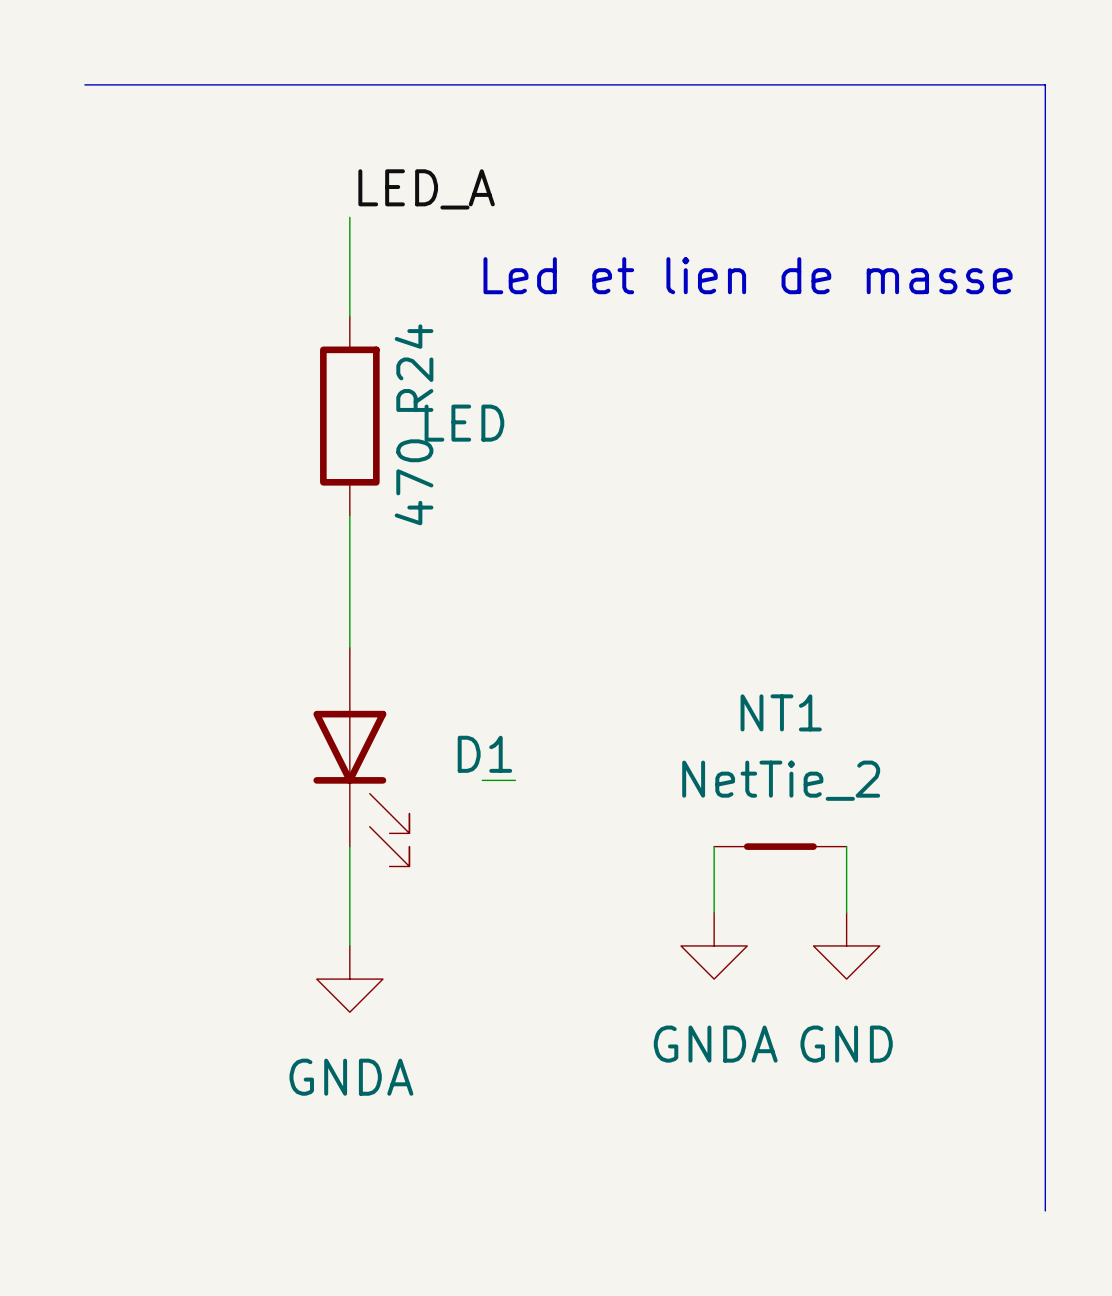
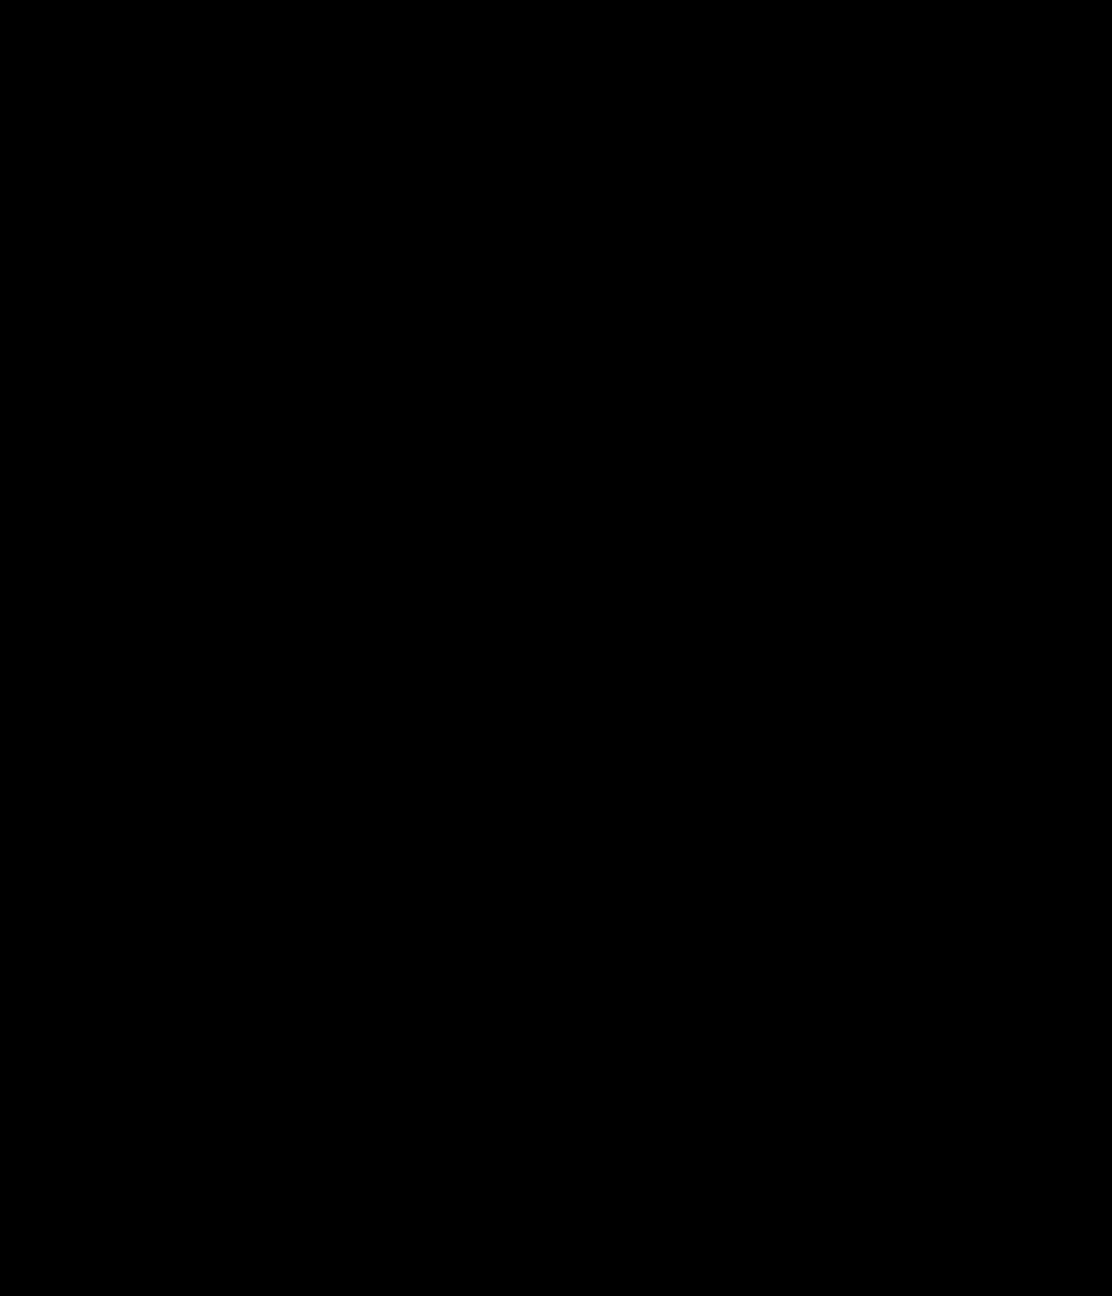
line: (84, 84) (1045, 84) (1045, 1210) -> none
label: LED_A (426, 189) -> none
wire: (349, 217) (349, 316) -> none
text: Led et lien de masse (748, 275) -> none
R24: 470 (349, 416) -> none
wire: (349, 515) (349, 647) -> none
D1: LED (361, 757) -> none
wire: (482, 780) (515, 780) -> none
wire: (349, 846) (349, 945) -> none
wire: (714, 846) (714, 912) -> none
NT1: NetTie_2 (780, 846) -> none
wire: (846, 846) (846, 912) -> none
power symbol: GNDA (714, 945) -> none
power symbol: GND (846, 945) -> none
power symbol: GNDA (349, 979) -> none

